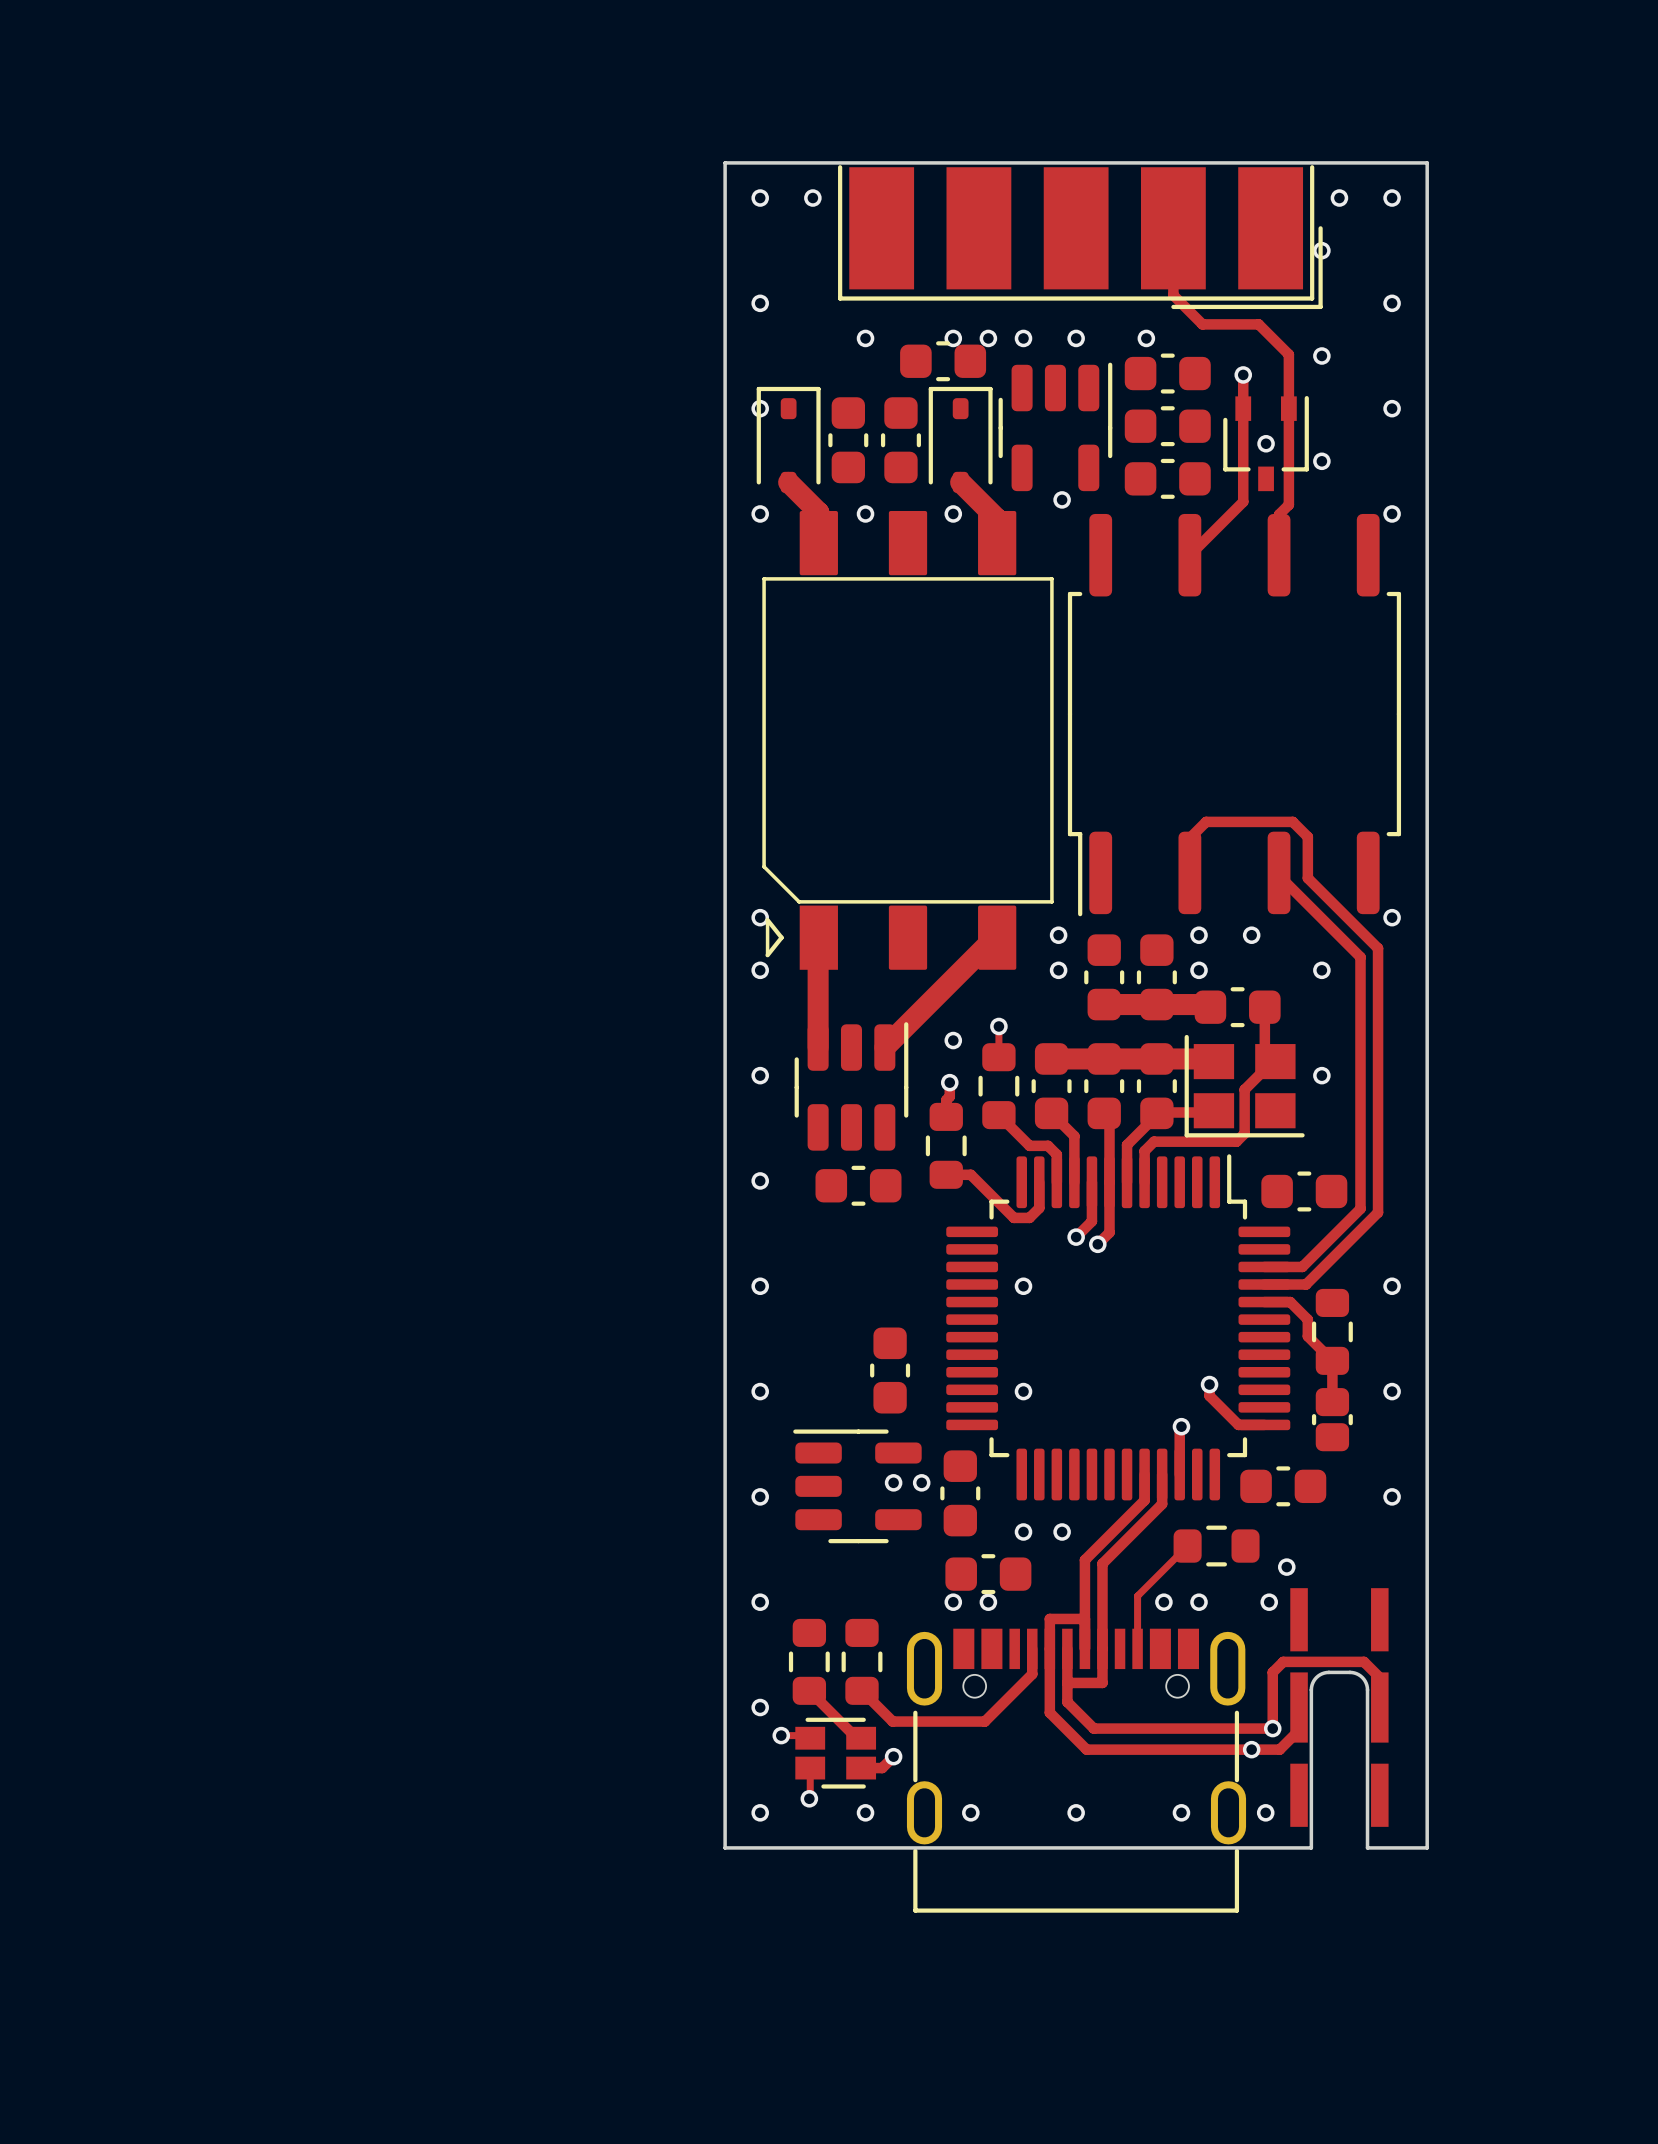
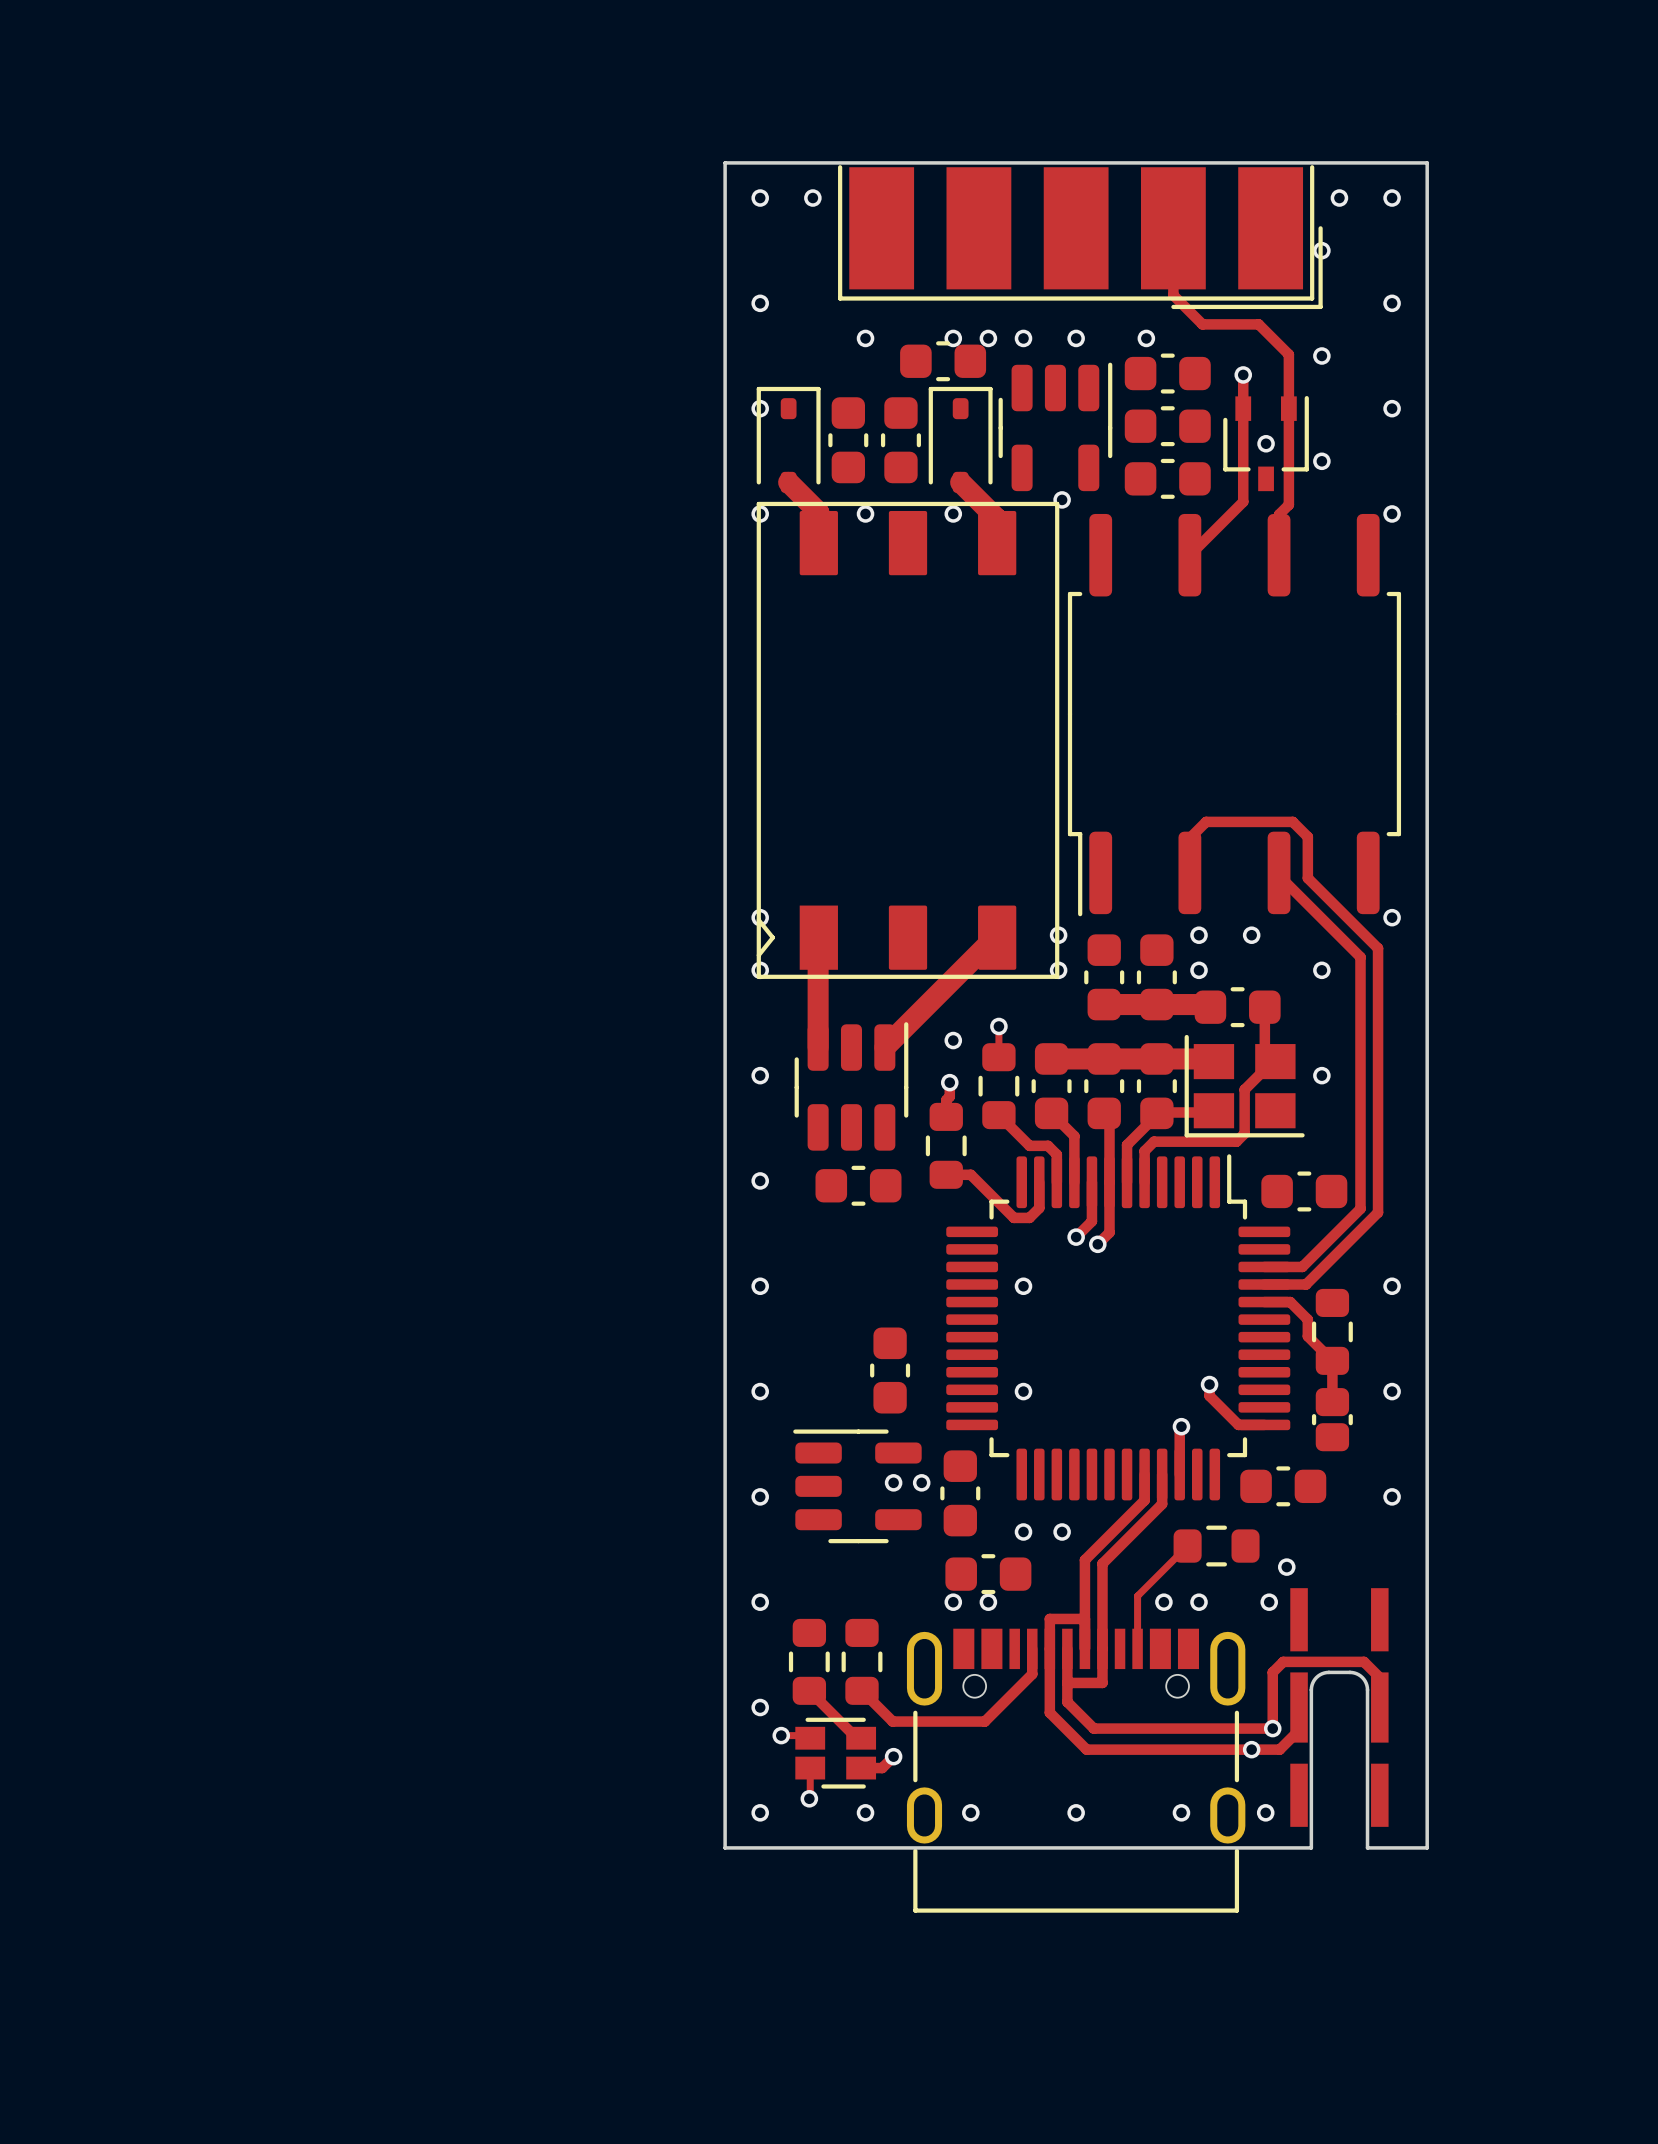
part footprint: [762, 510, 1054, 970] -> [756, 501, 1060, 979]
part footprint: [906, 1628, 1247, 1913] -> [906, 1628, 1246, 1913]

